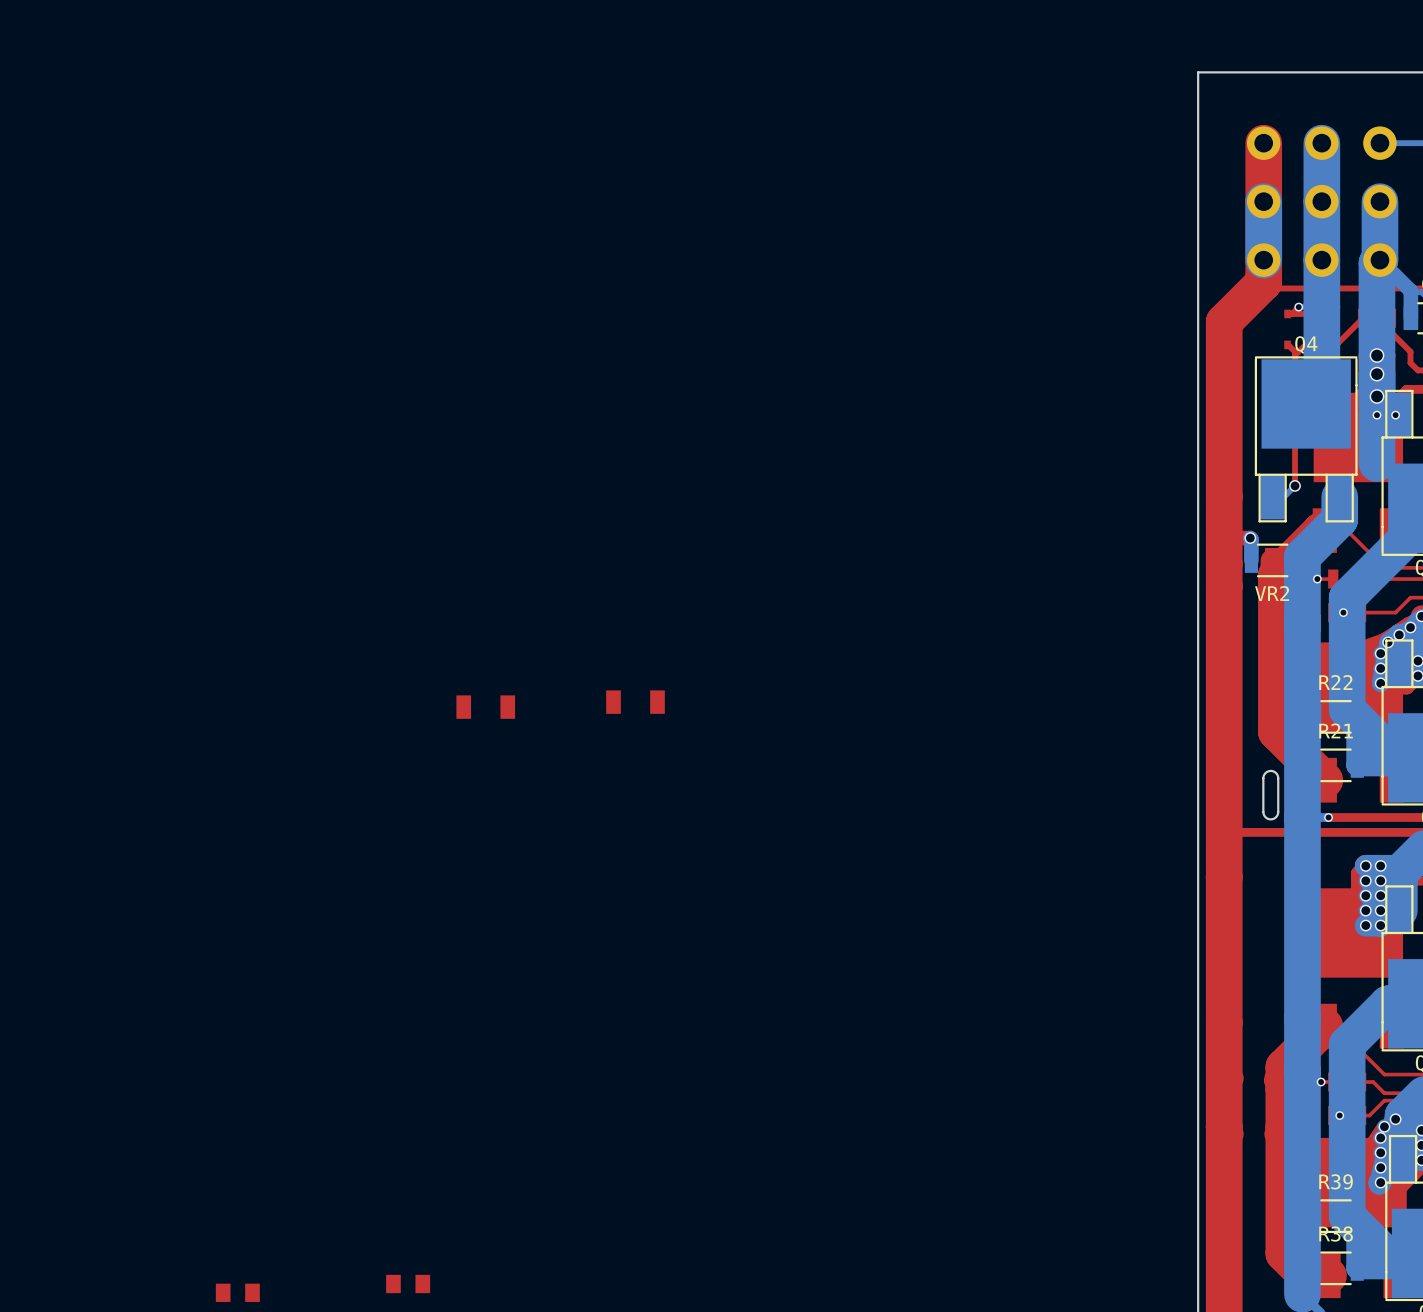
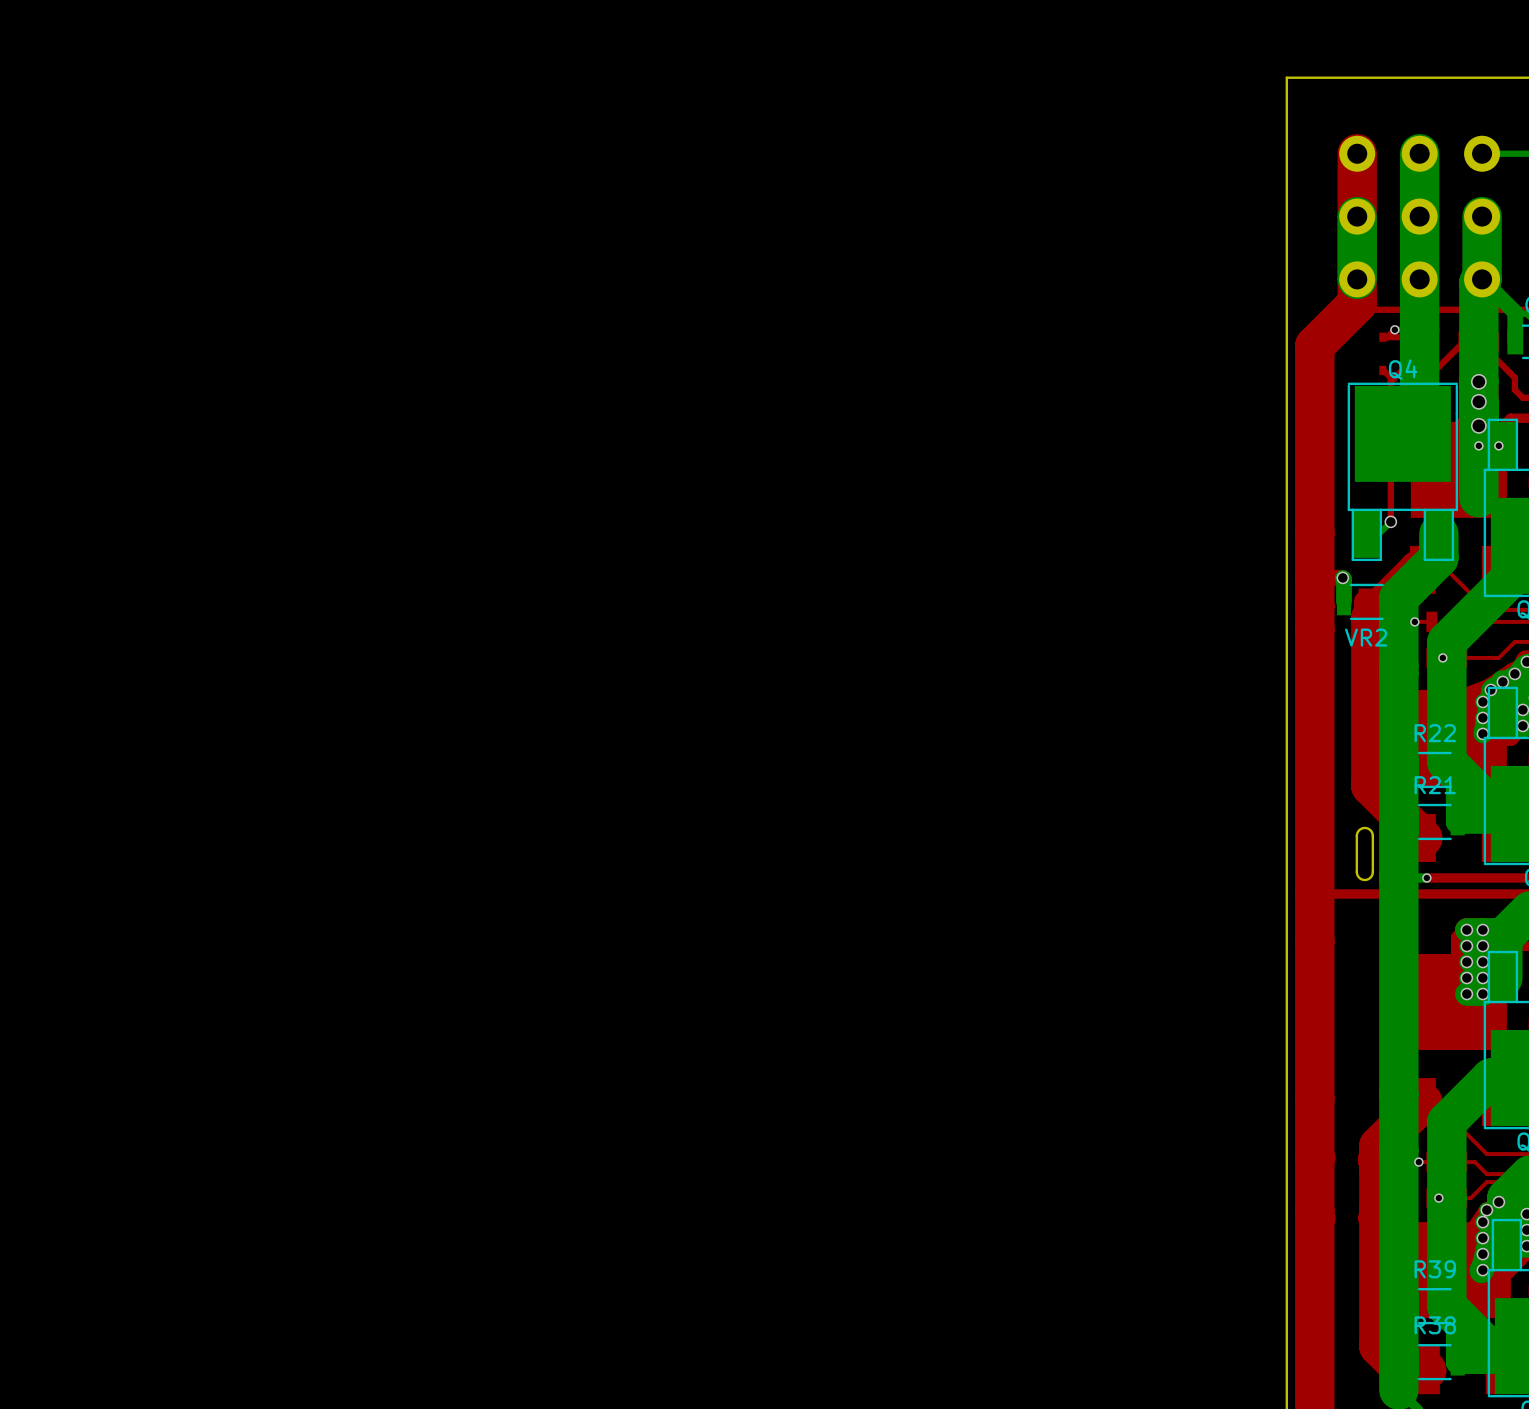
part: (635, 702) -> none
part: (485, 707) -> none
part: (408, 1284) -> none
part: (237, 1292) -> none

